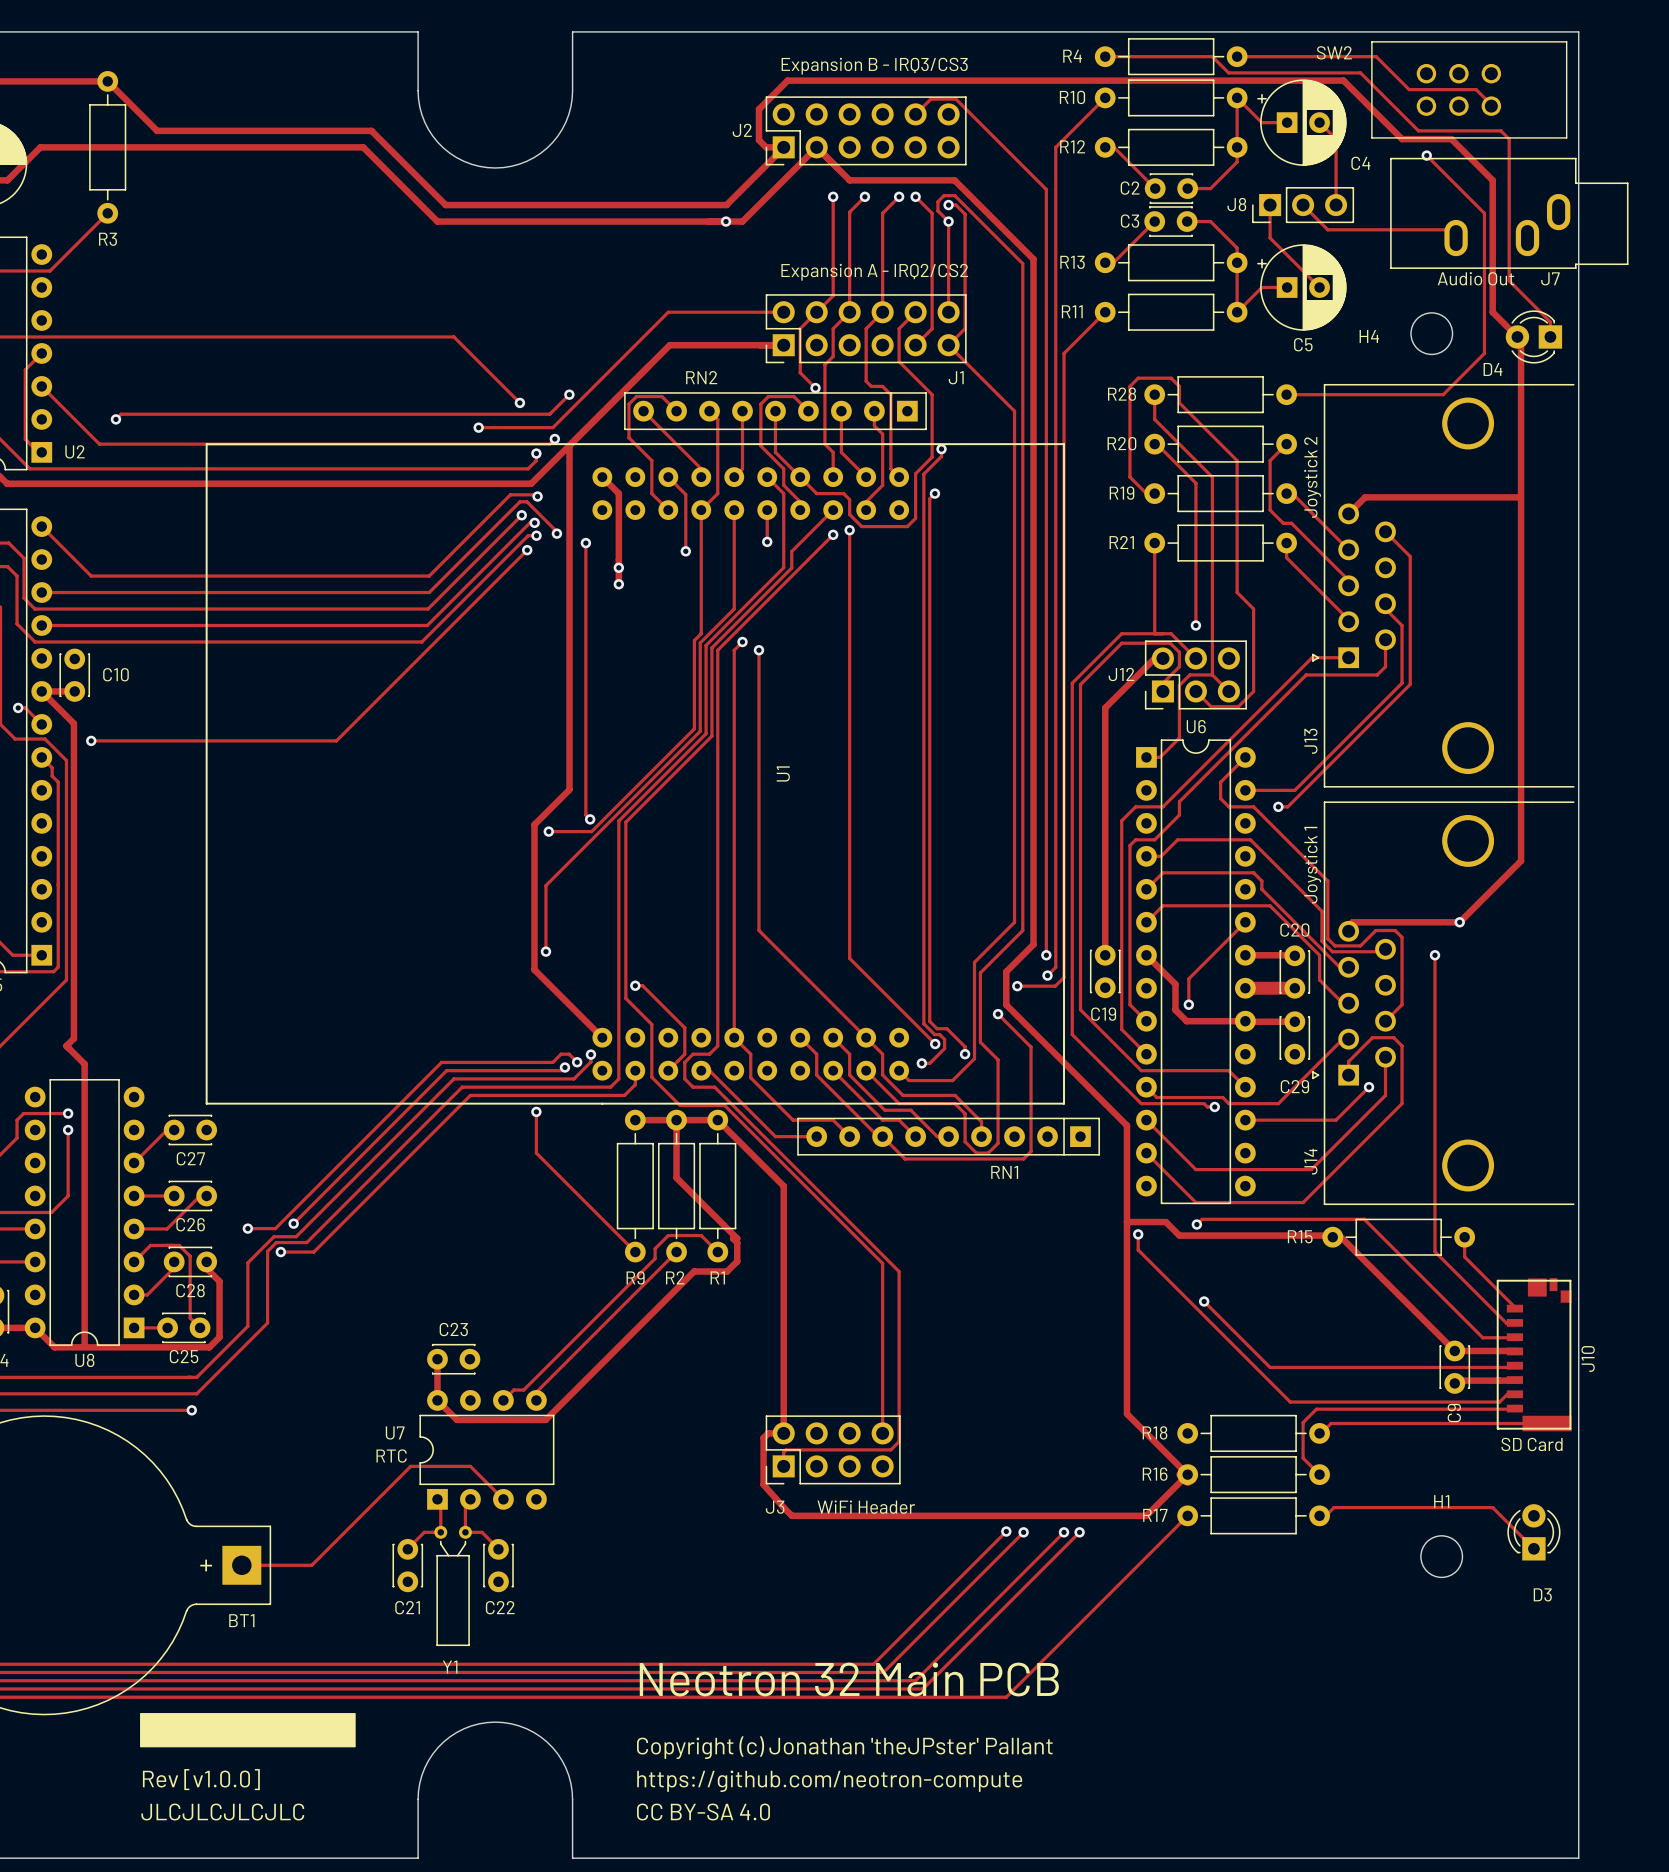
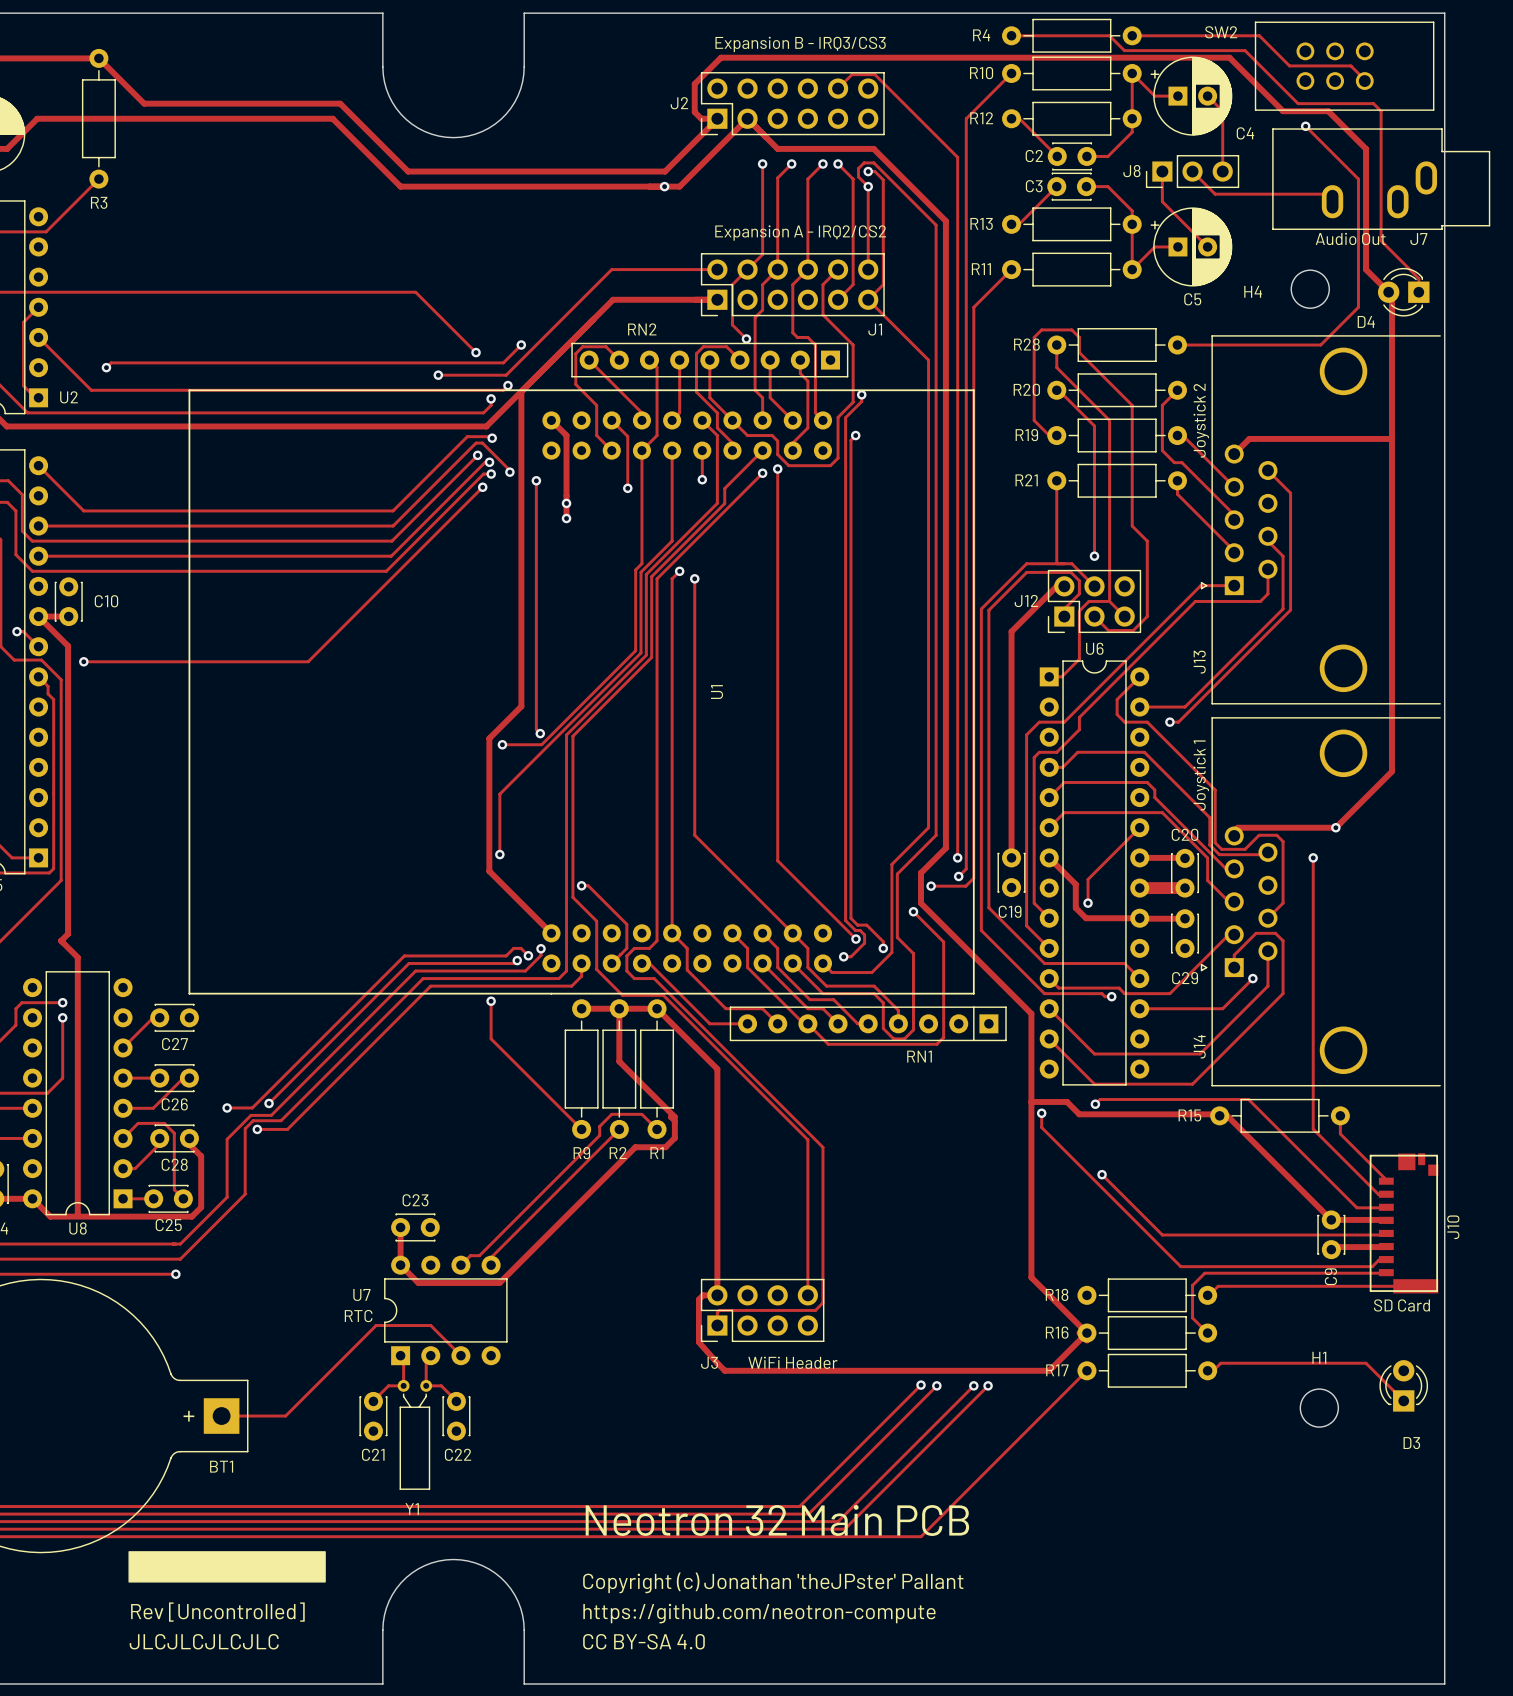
text: Rev [v1.0.0] (201, 1779) -> Rev [Uncontrolled] (217, 1612)

